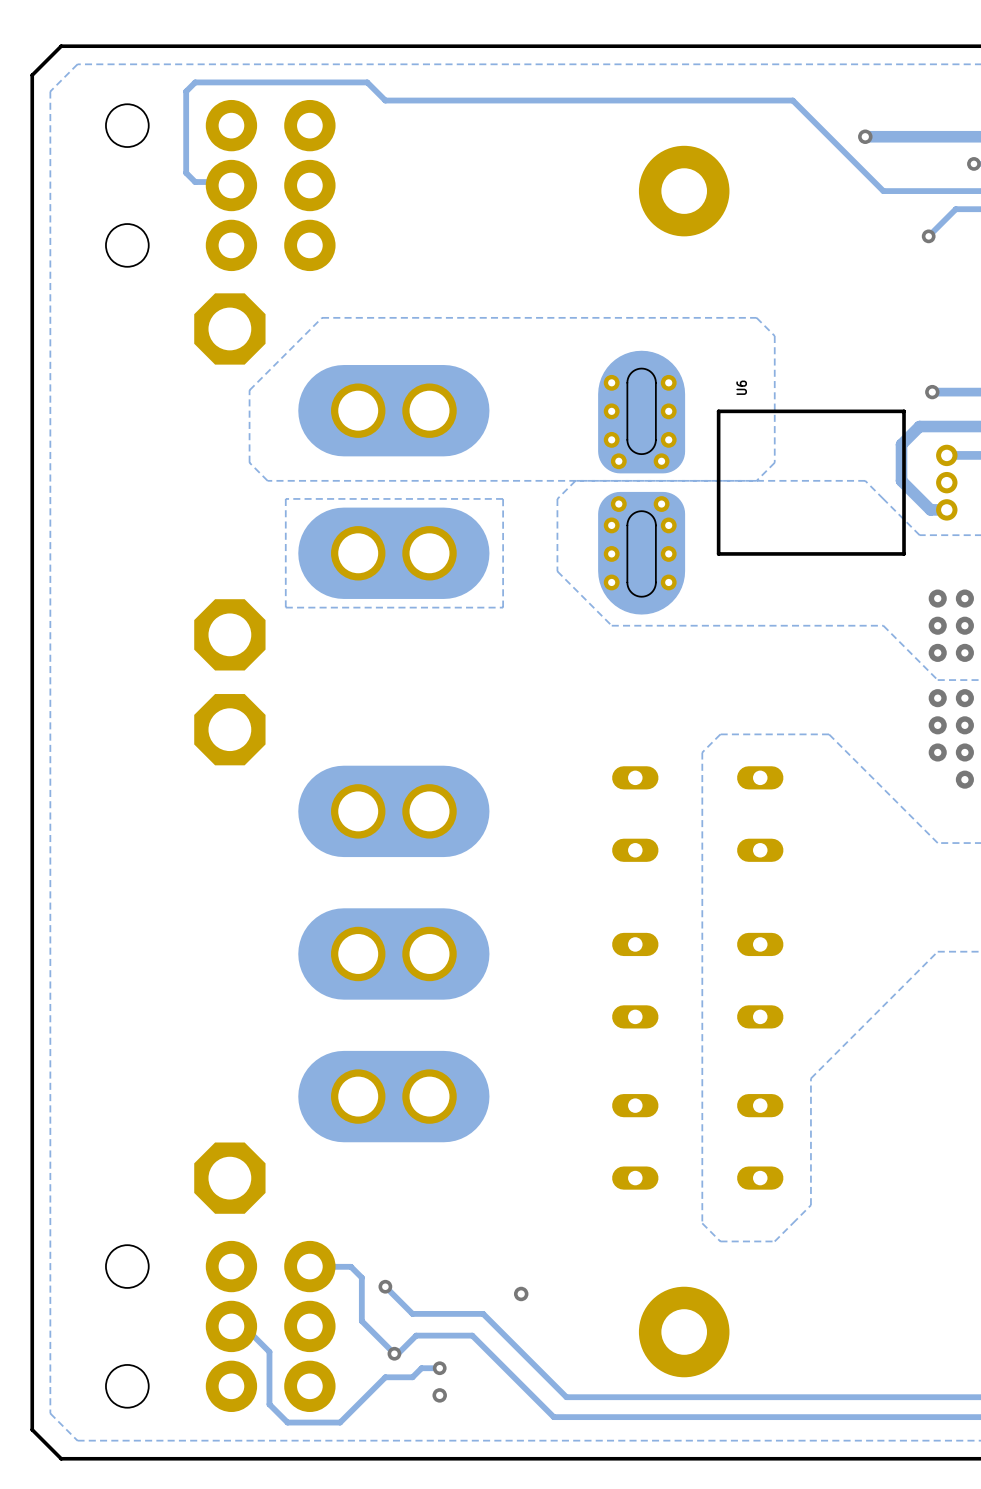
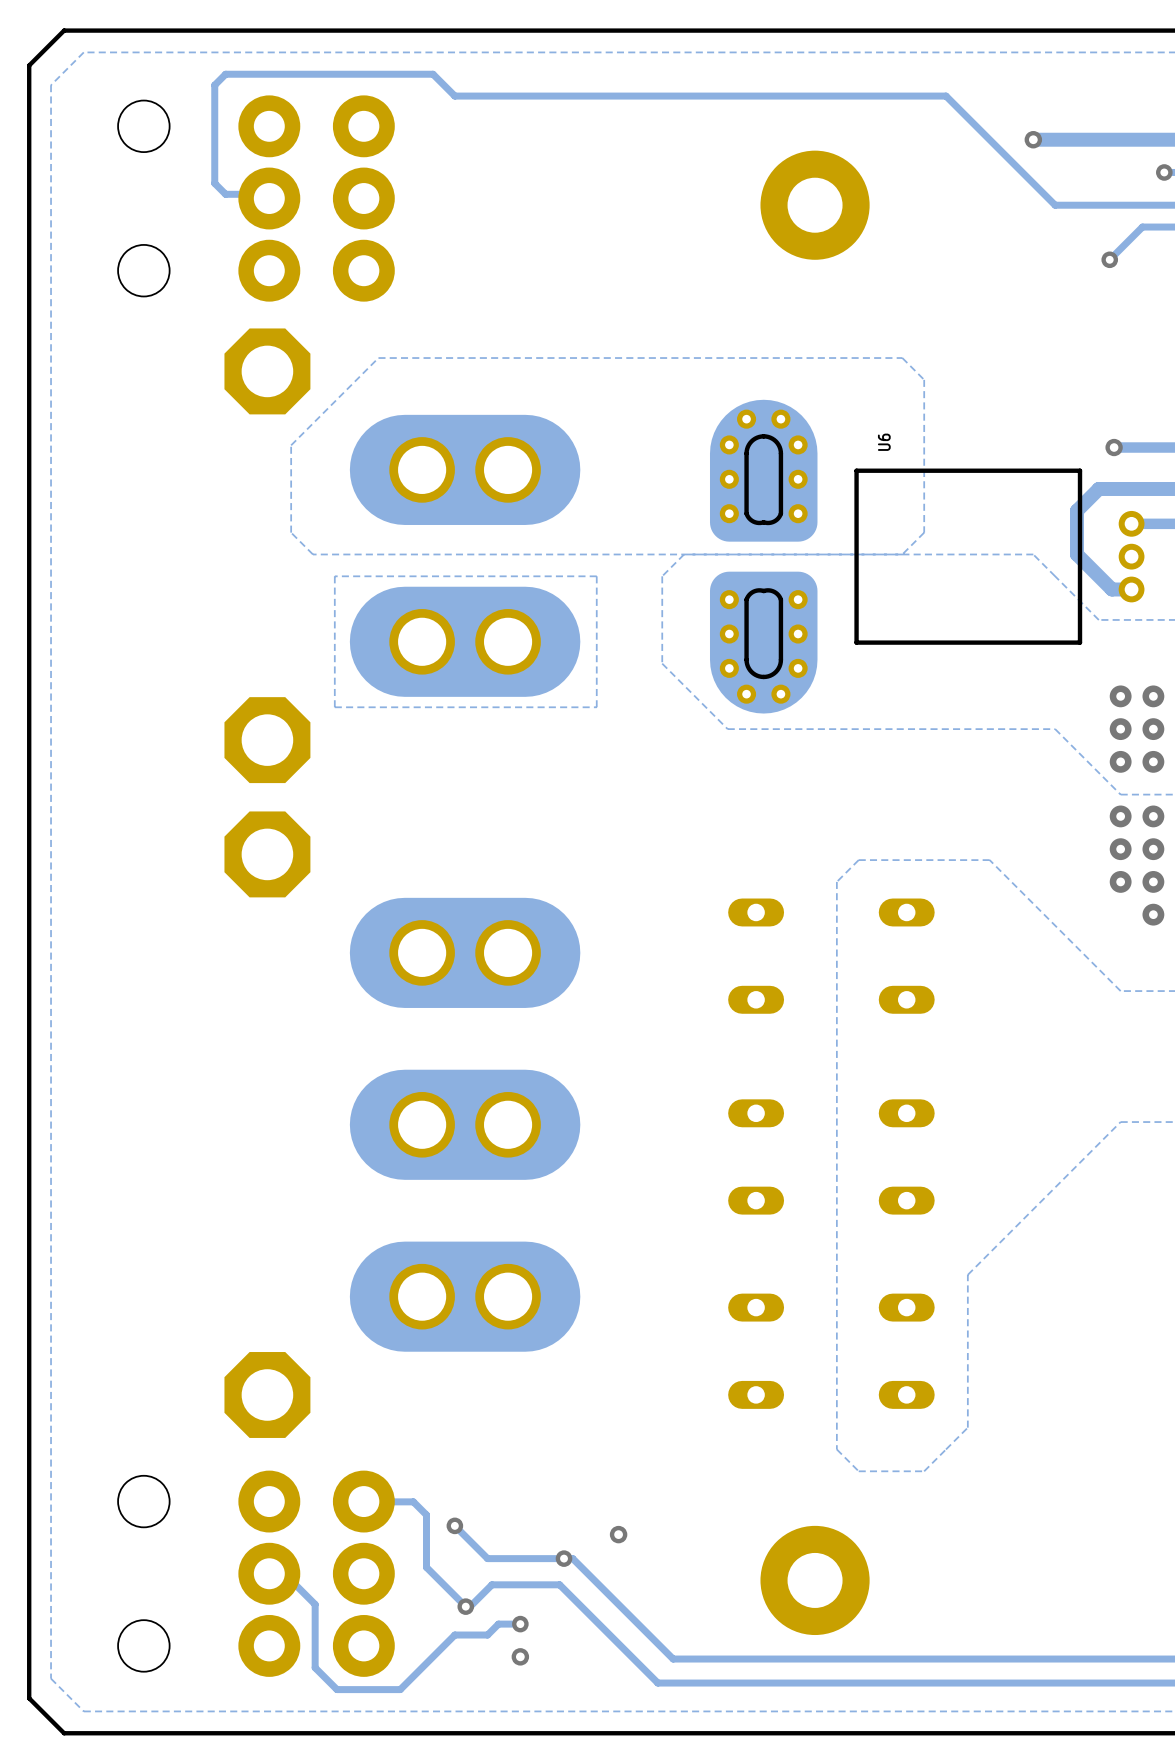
U6 footprint: [598, 350, 958, 615] -> [709, 399, 1145, 714]
via: none -> (564, 1558)

